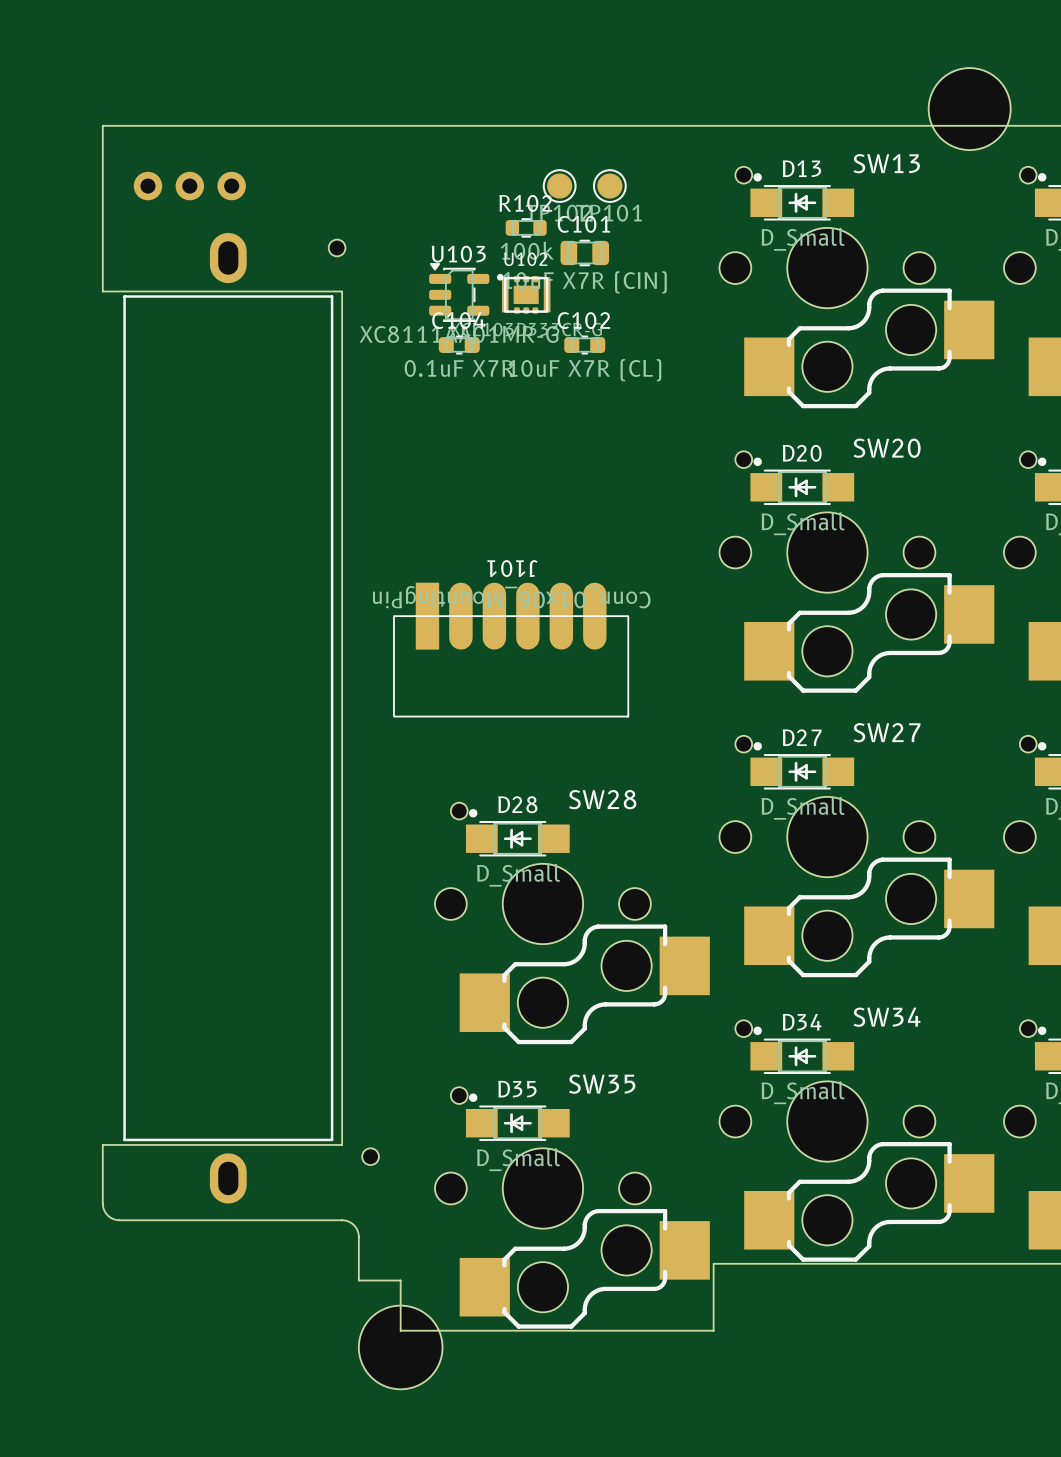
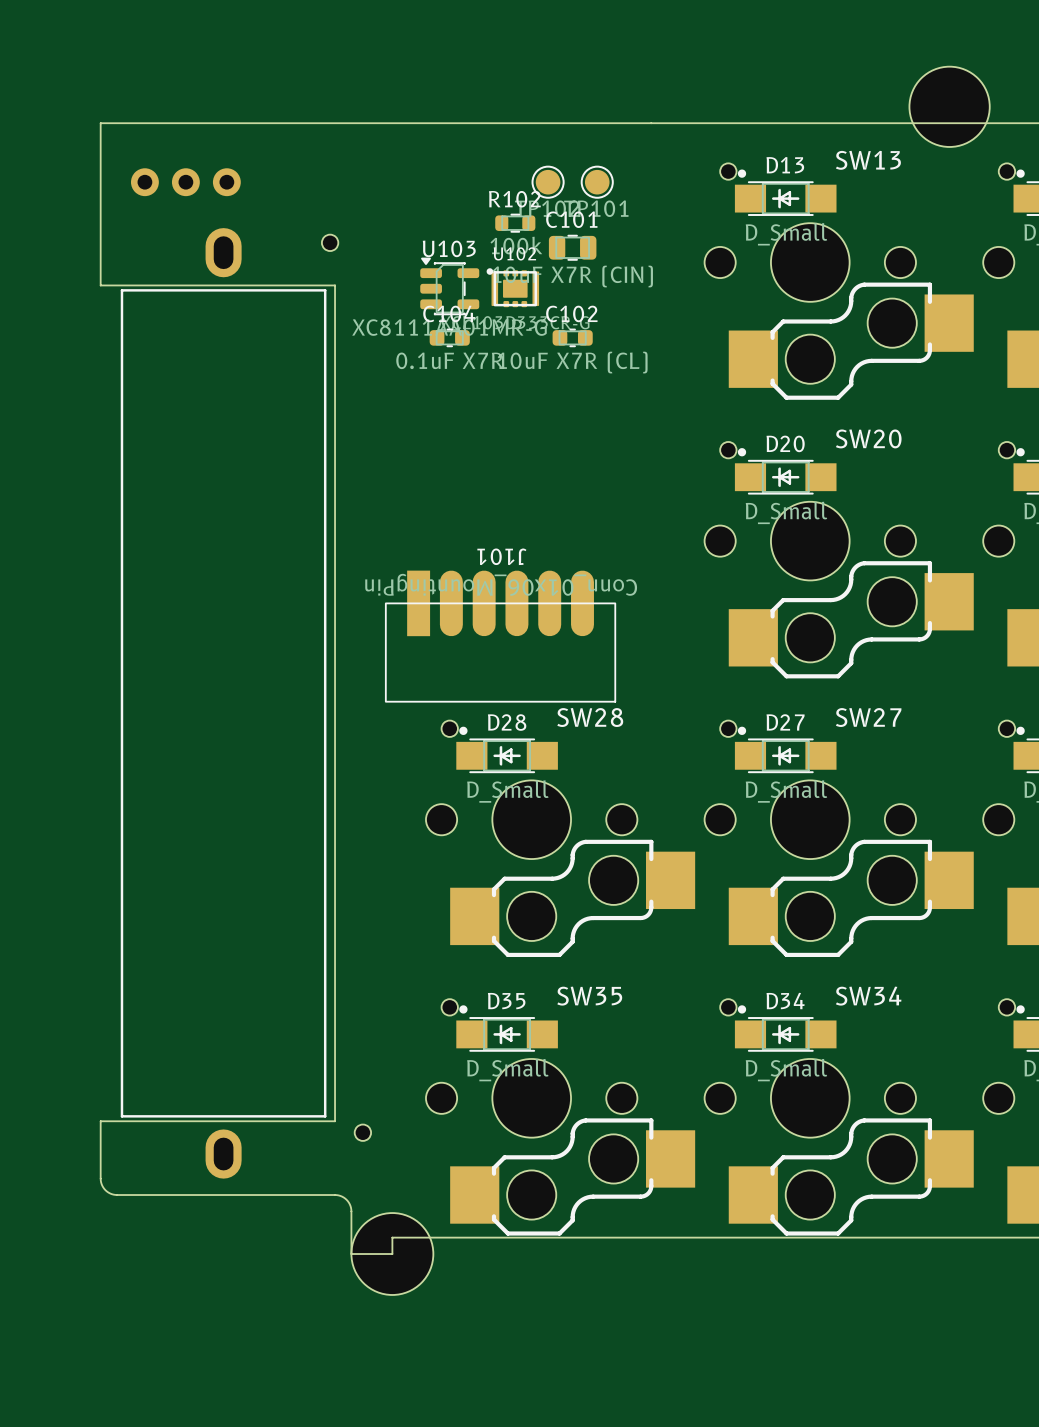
D28 position: (517, 832) -> (507, 749)
SW28 position: (572, 923) -> (560, 838)
D35 position: (517, 1117) -> (507, 1028)
SW35 position: (572, 1207) -> (560, 1117)
board edge: (713, 1263) (713, 1330) (400, 1330) (400, 1280) -> (698, 1237) (392, 1237) (392, 1254)
part position: (400, 1347) -> (392, 1254)

